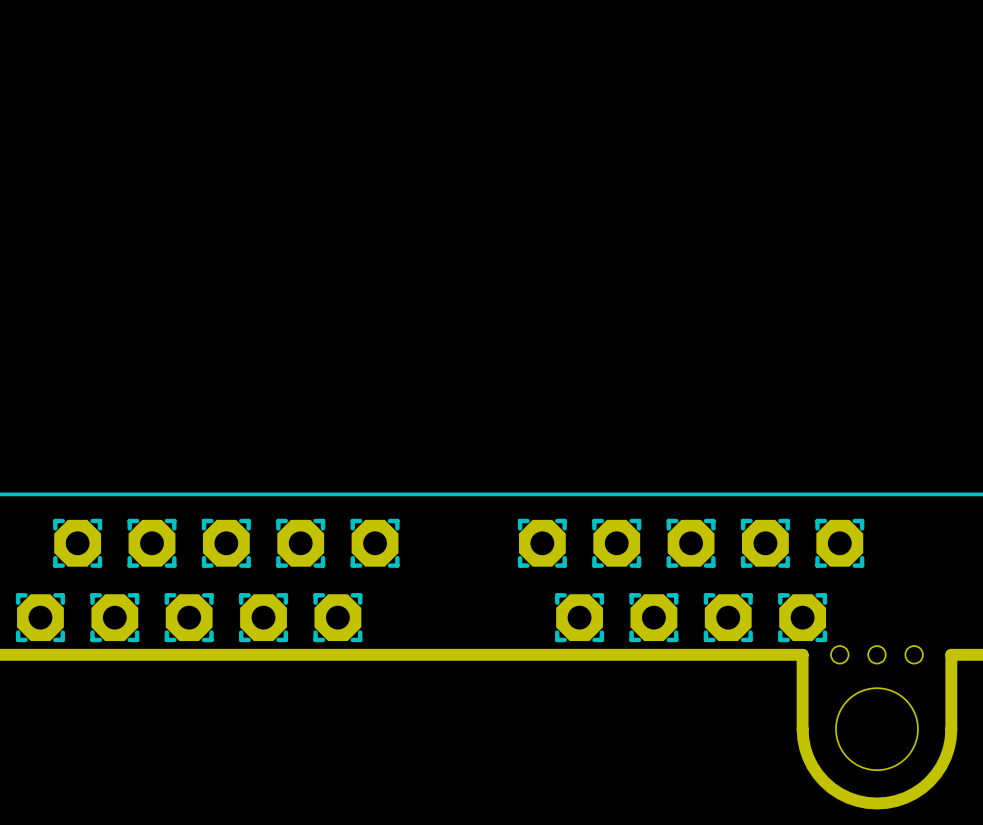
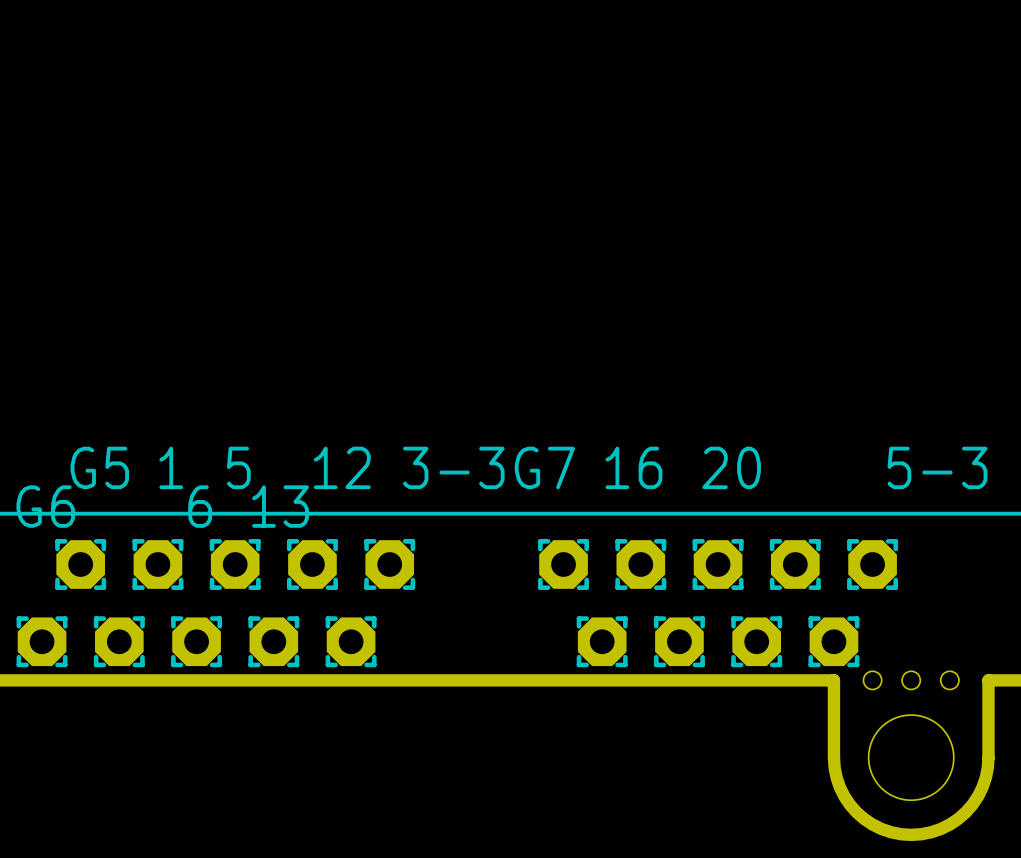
G5 name: none -> G5 (99, 467)
1 name: none -> 1 (171, 467)
5 name: none -> 5 (238, 467)
12 name: none -> 12 (342, 467)
3-3 name: none -> 3-3 (453, 467)
G7 name: none -> G7 (544, 467)
16 name: none -> 16 (633, 467)
20 name: none -> 20 (731, 467)
5-3 name: none -> 5-3 (937, 467)
G6 name: none -> G6 (45, 506)
6 name: none -> 6 (200, 506)
13 name: none -> 13 (280, 506)

